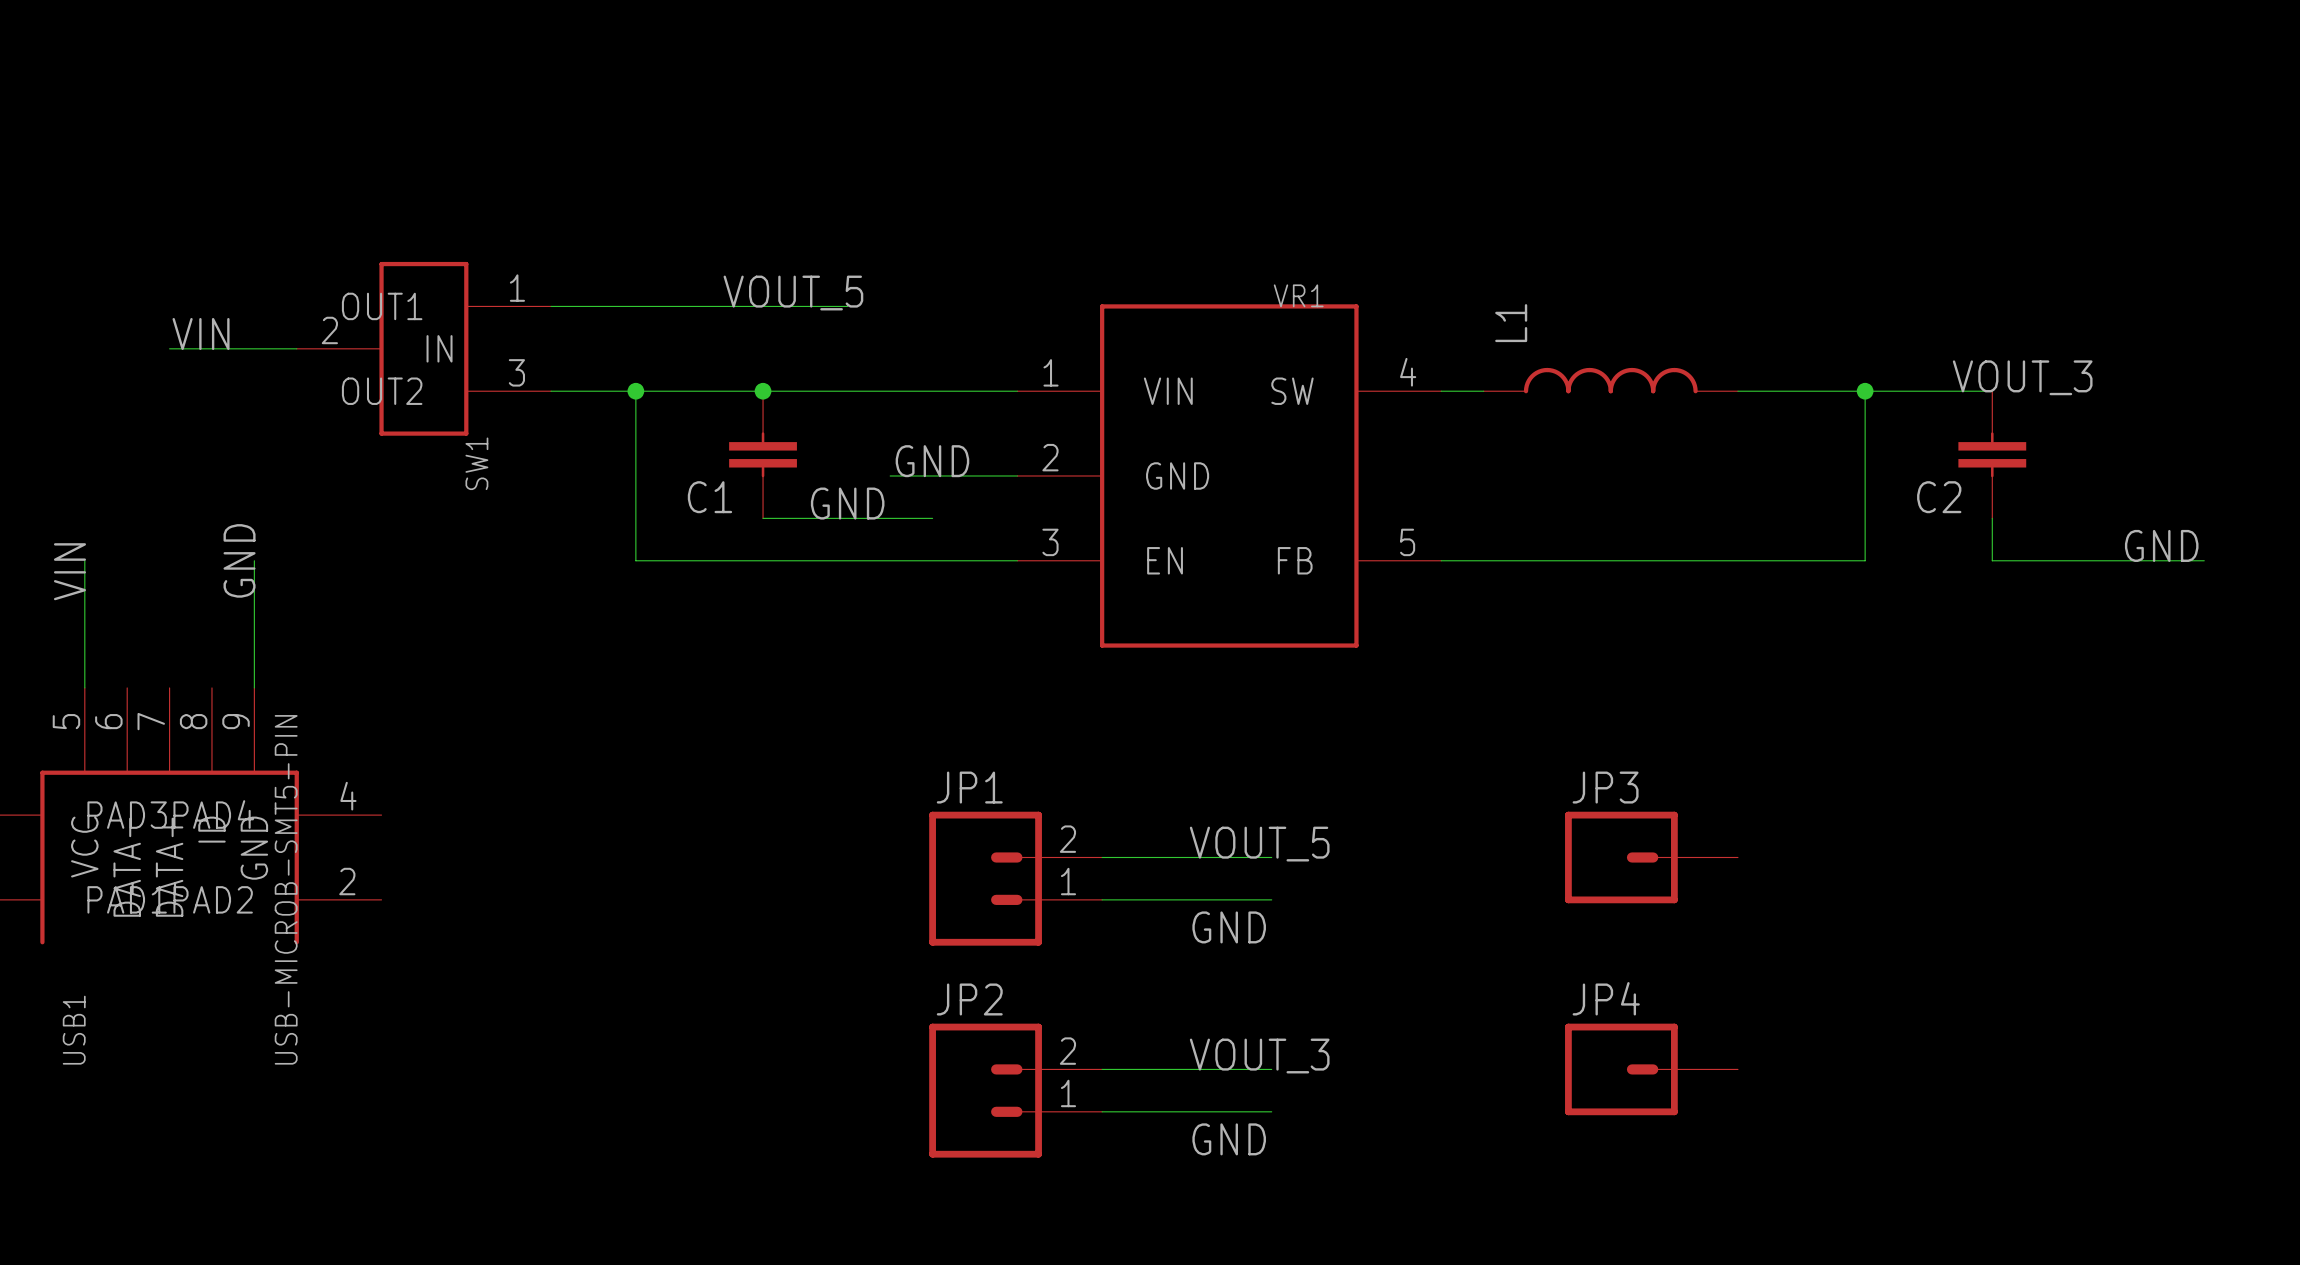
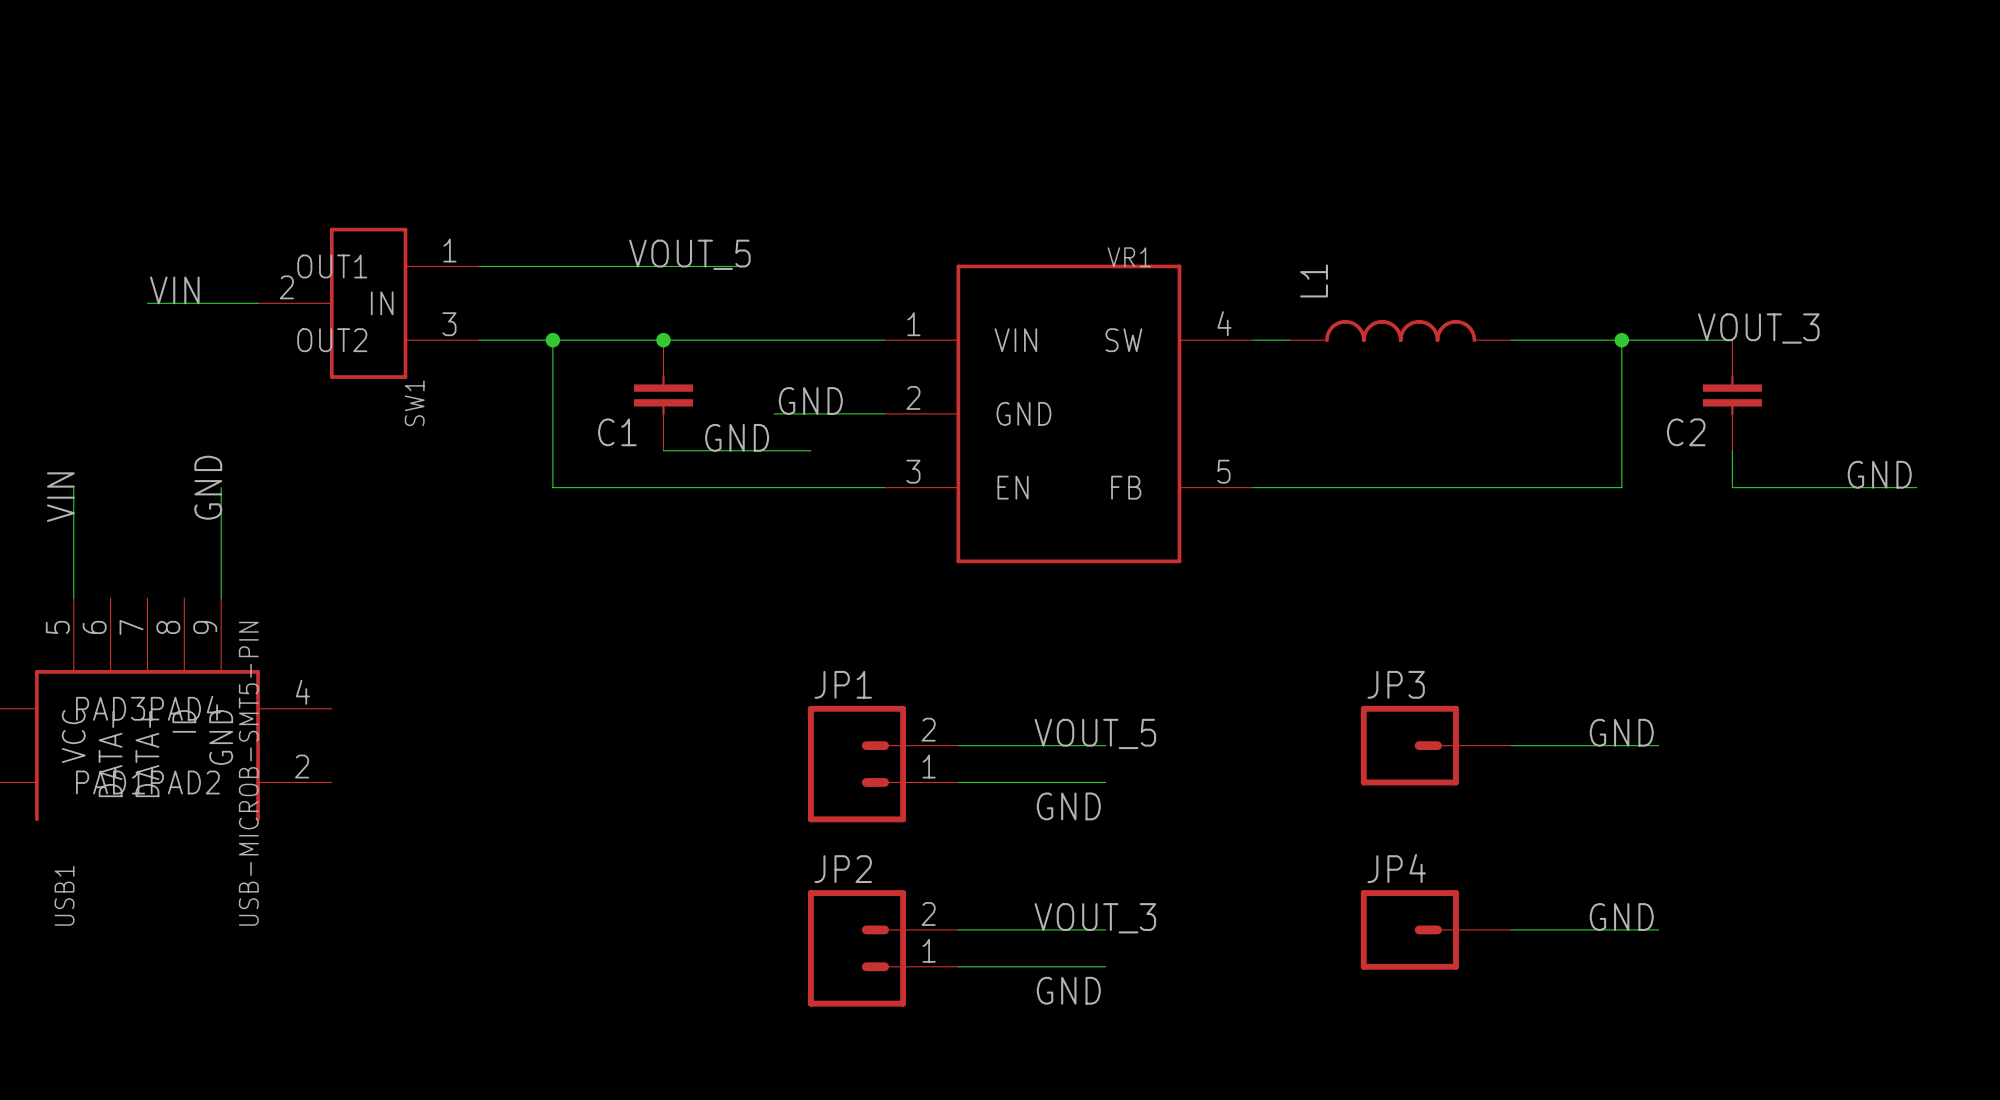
label: none -> GND (1621, 732)
wire: none -> (1511, 745) (1658, 745)
label: none -> GND (1621, 917)
wire: none -> (1511, 929) (1658, 929)

